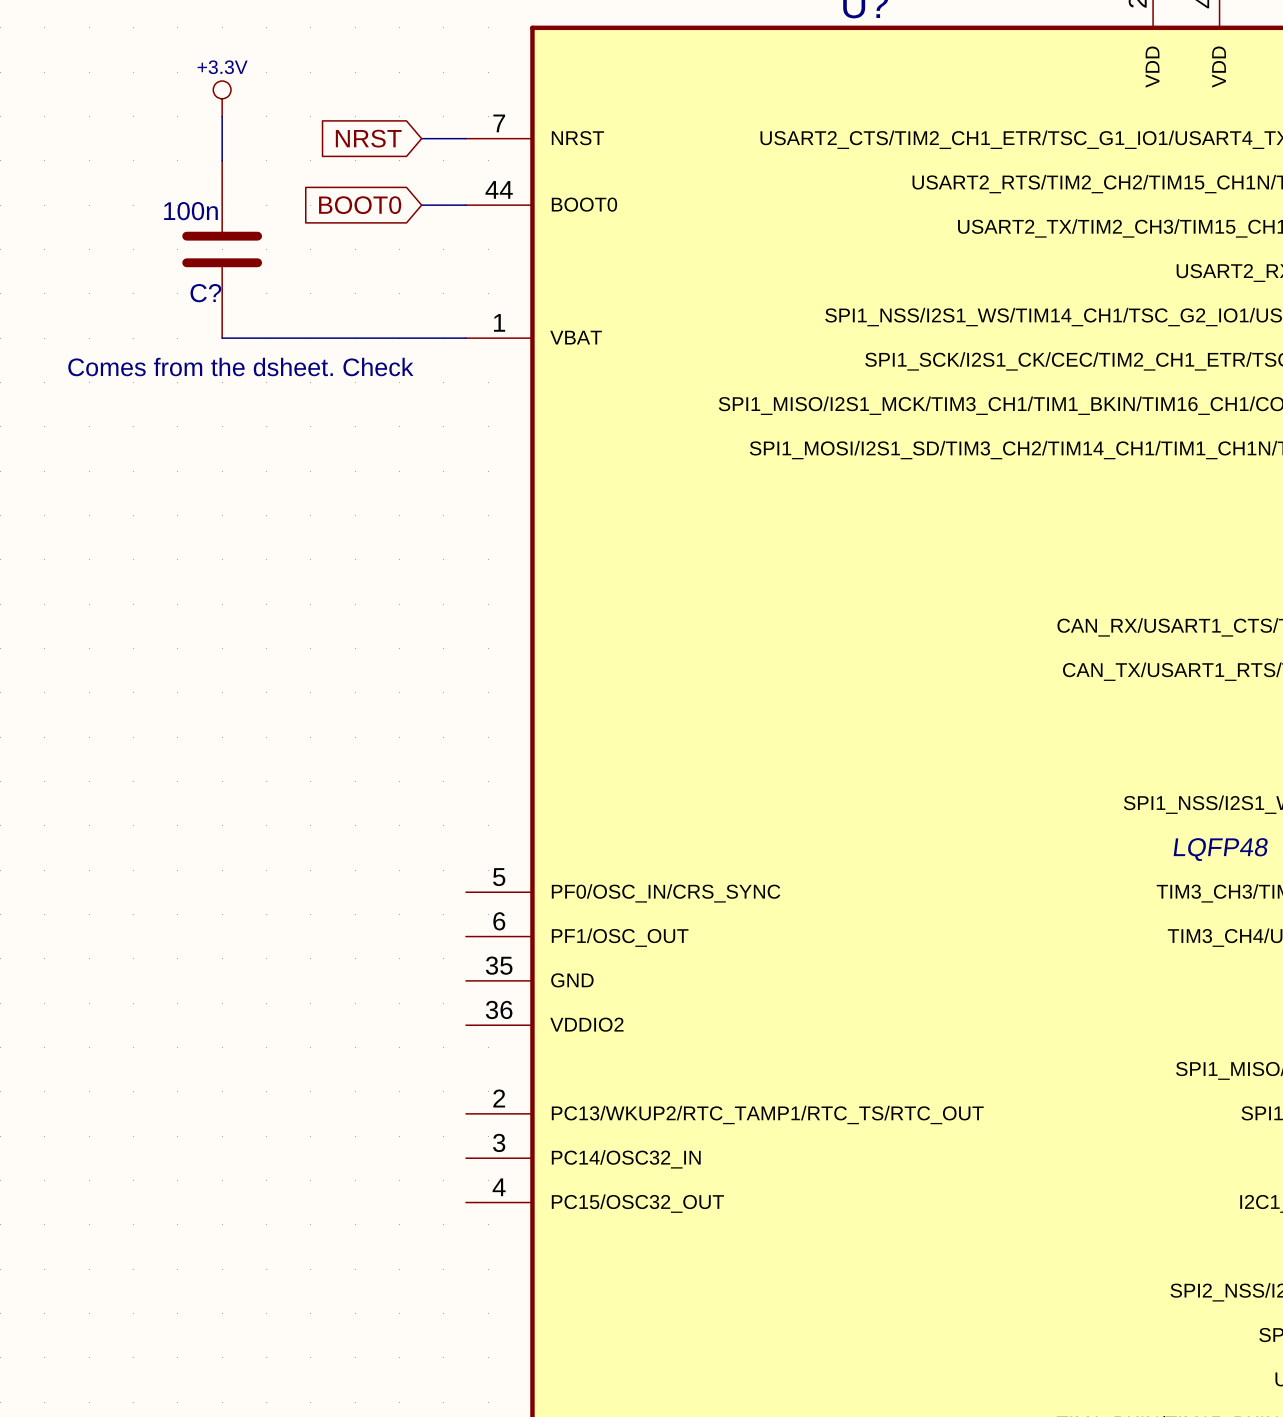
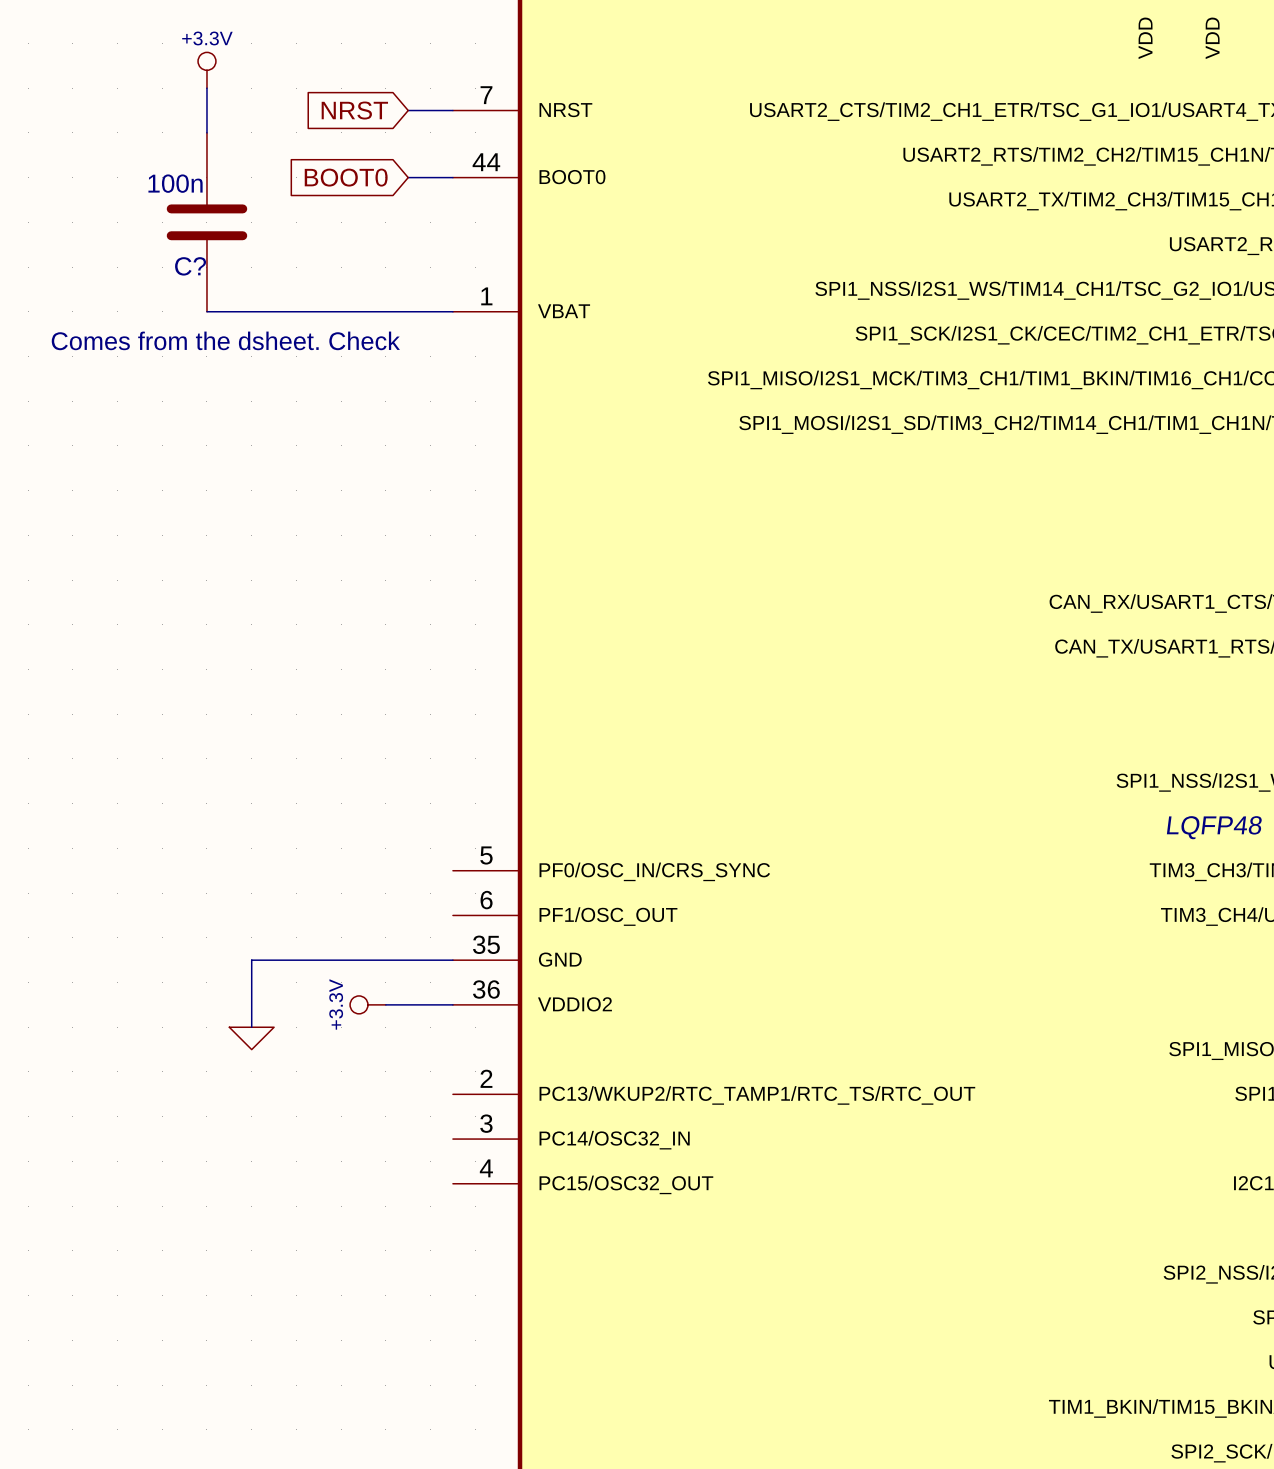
wire: none -> (452, 960) (251, 960) (251, 1027)
power symbol: none -> +3.3V (367, 1004)
wire: none -> (385, 1004) (452, 1004)
power symbol: none -> (251, 1038)

